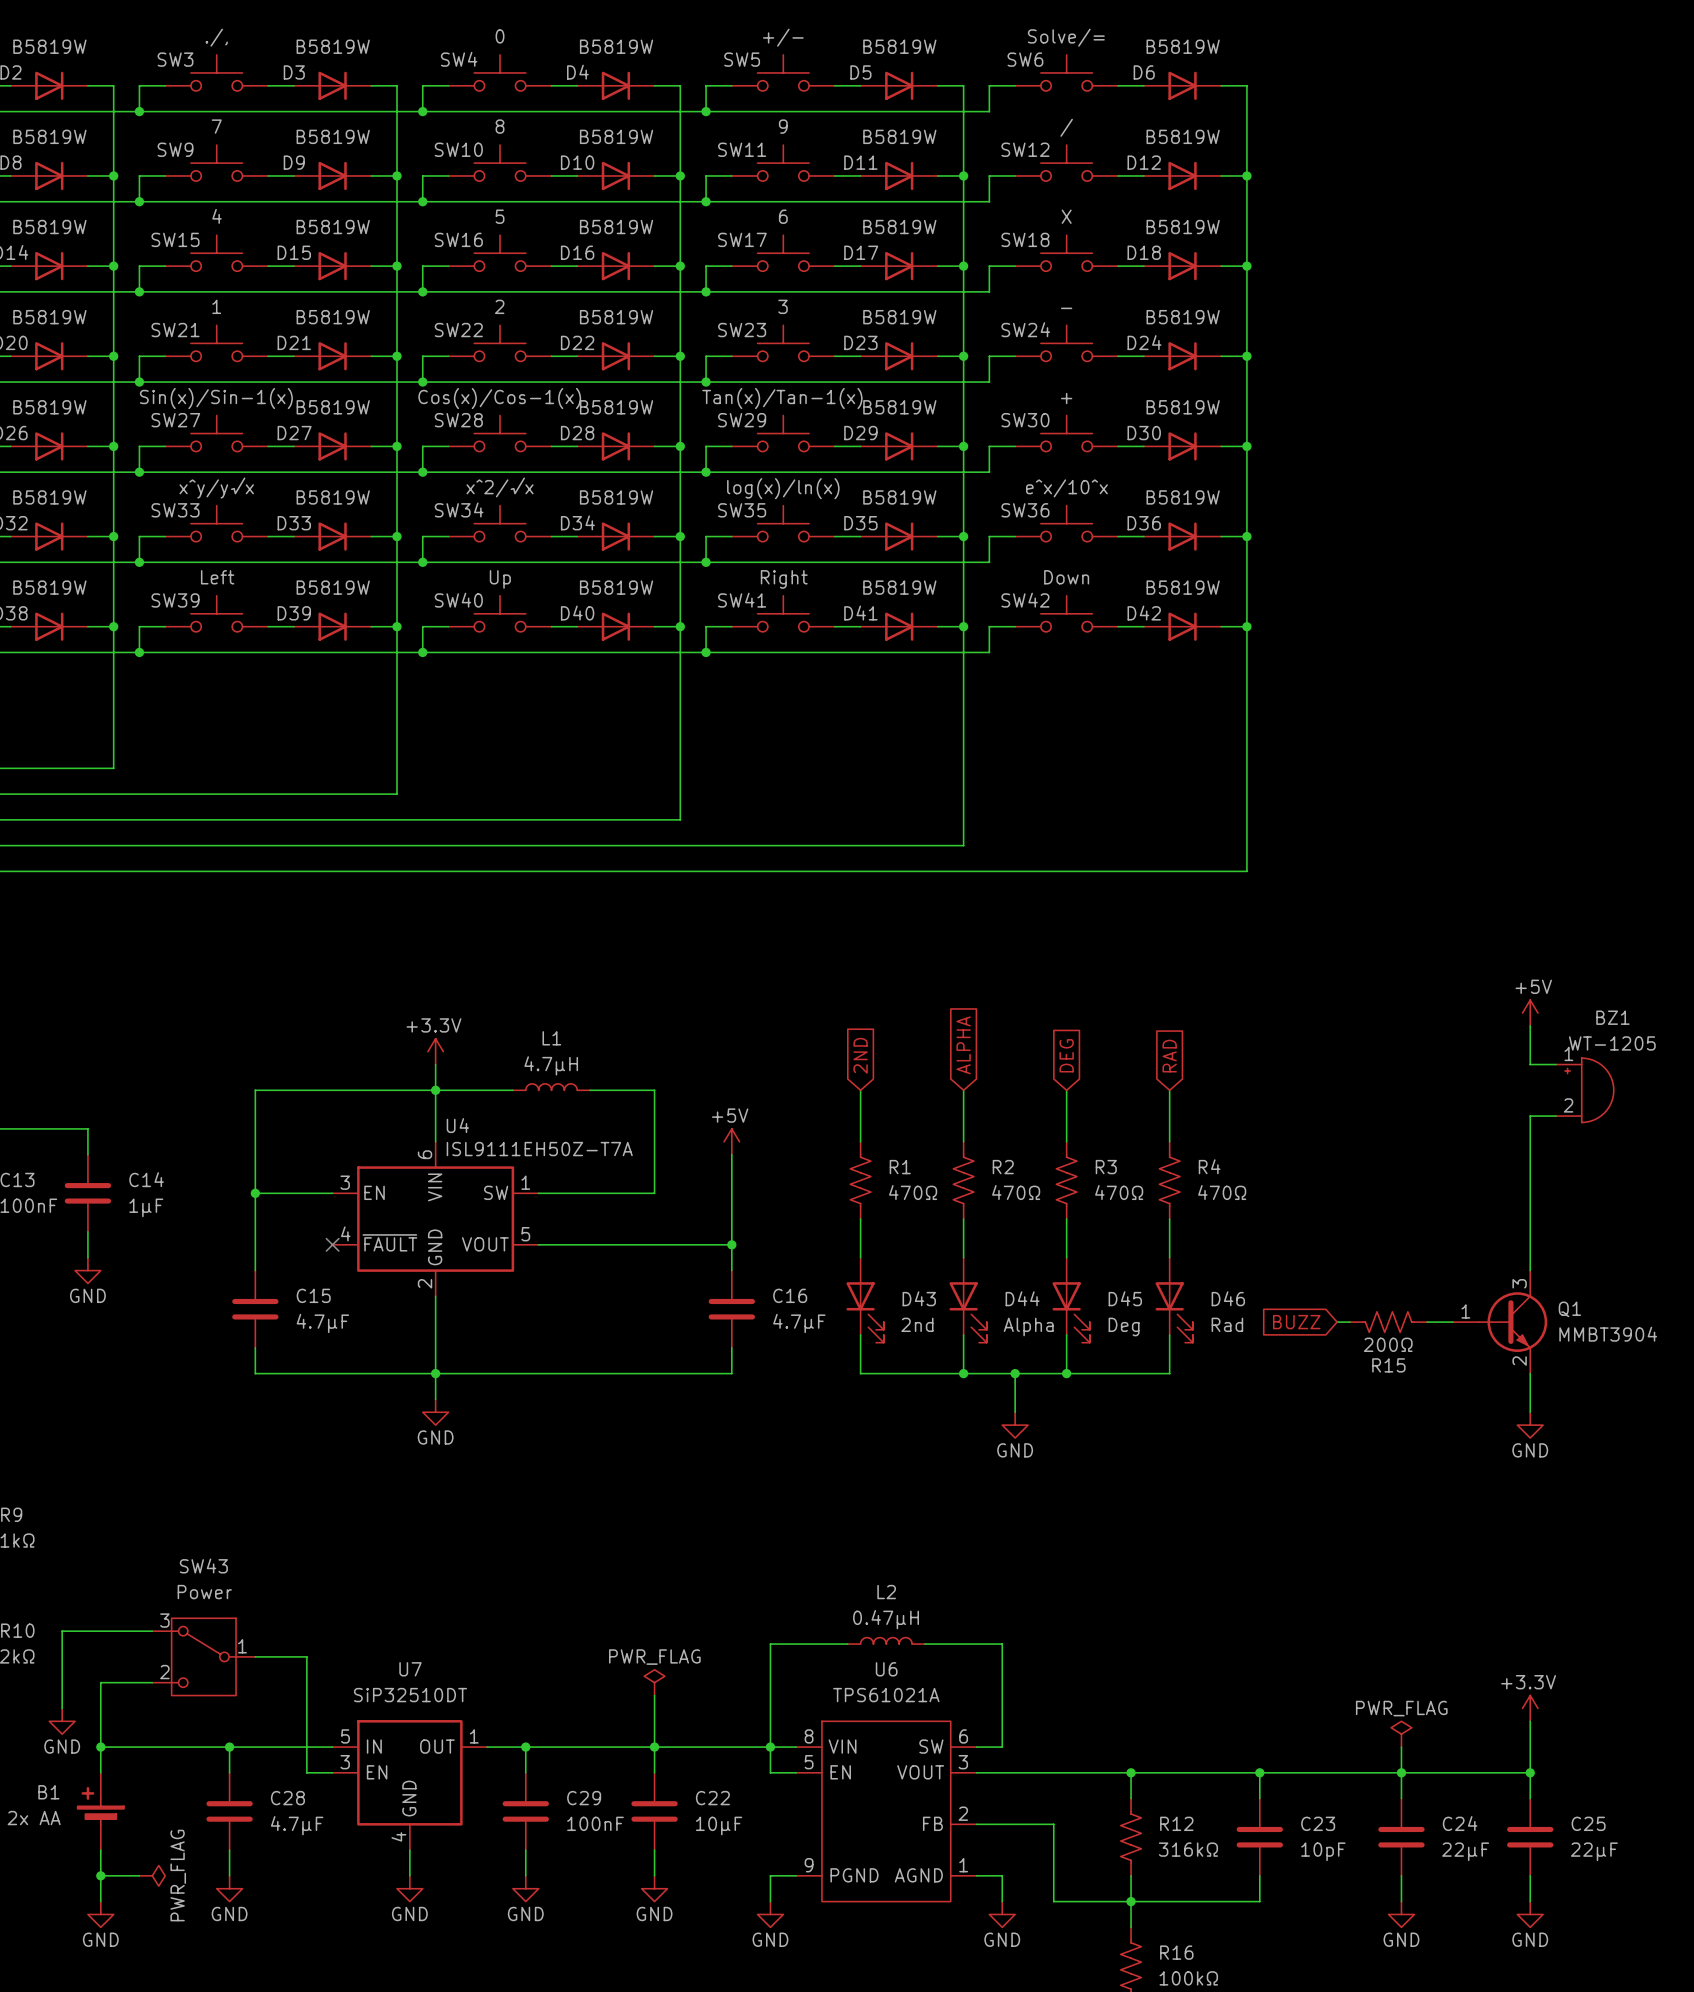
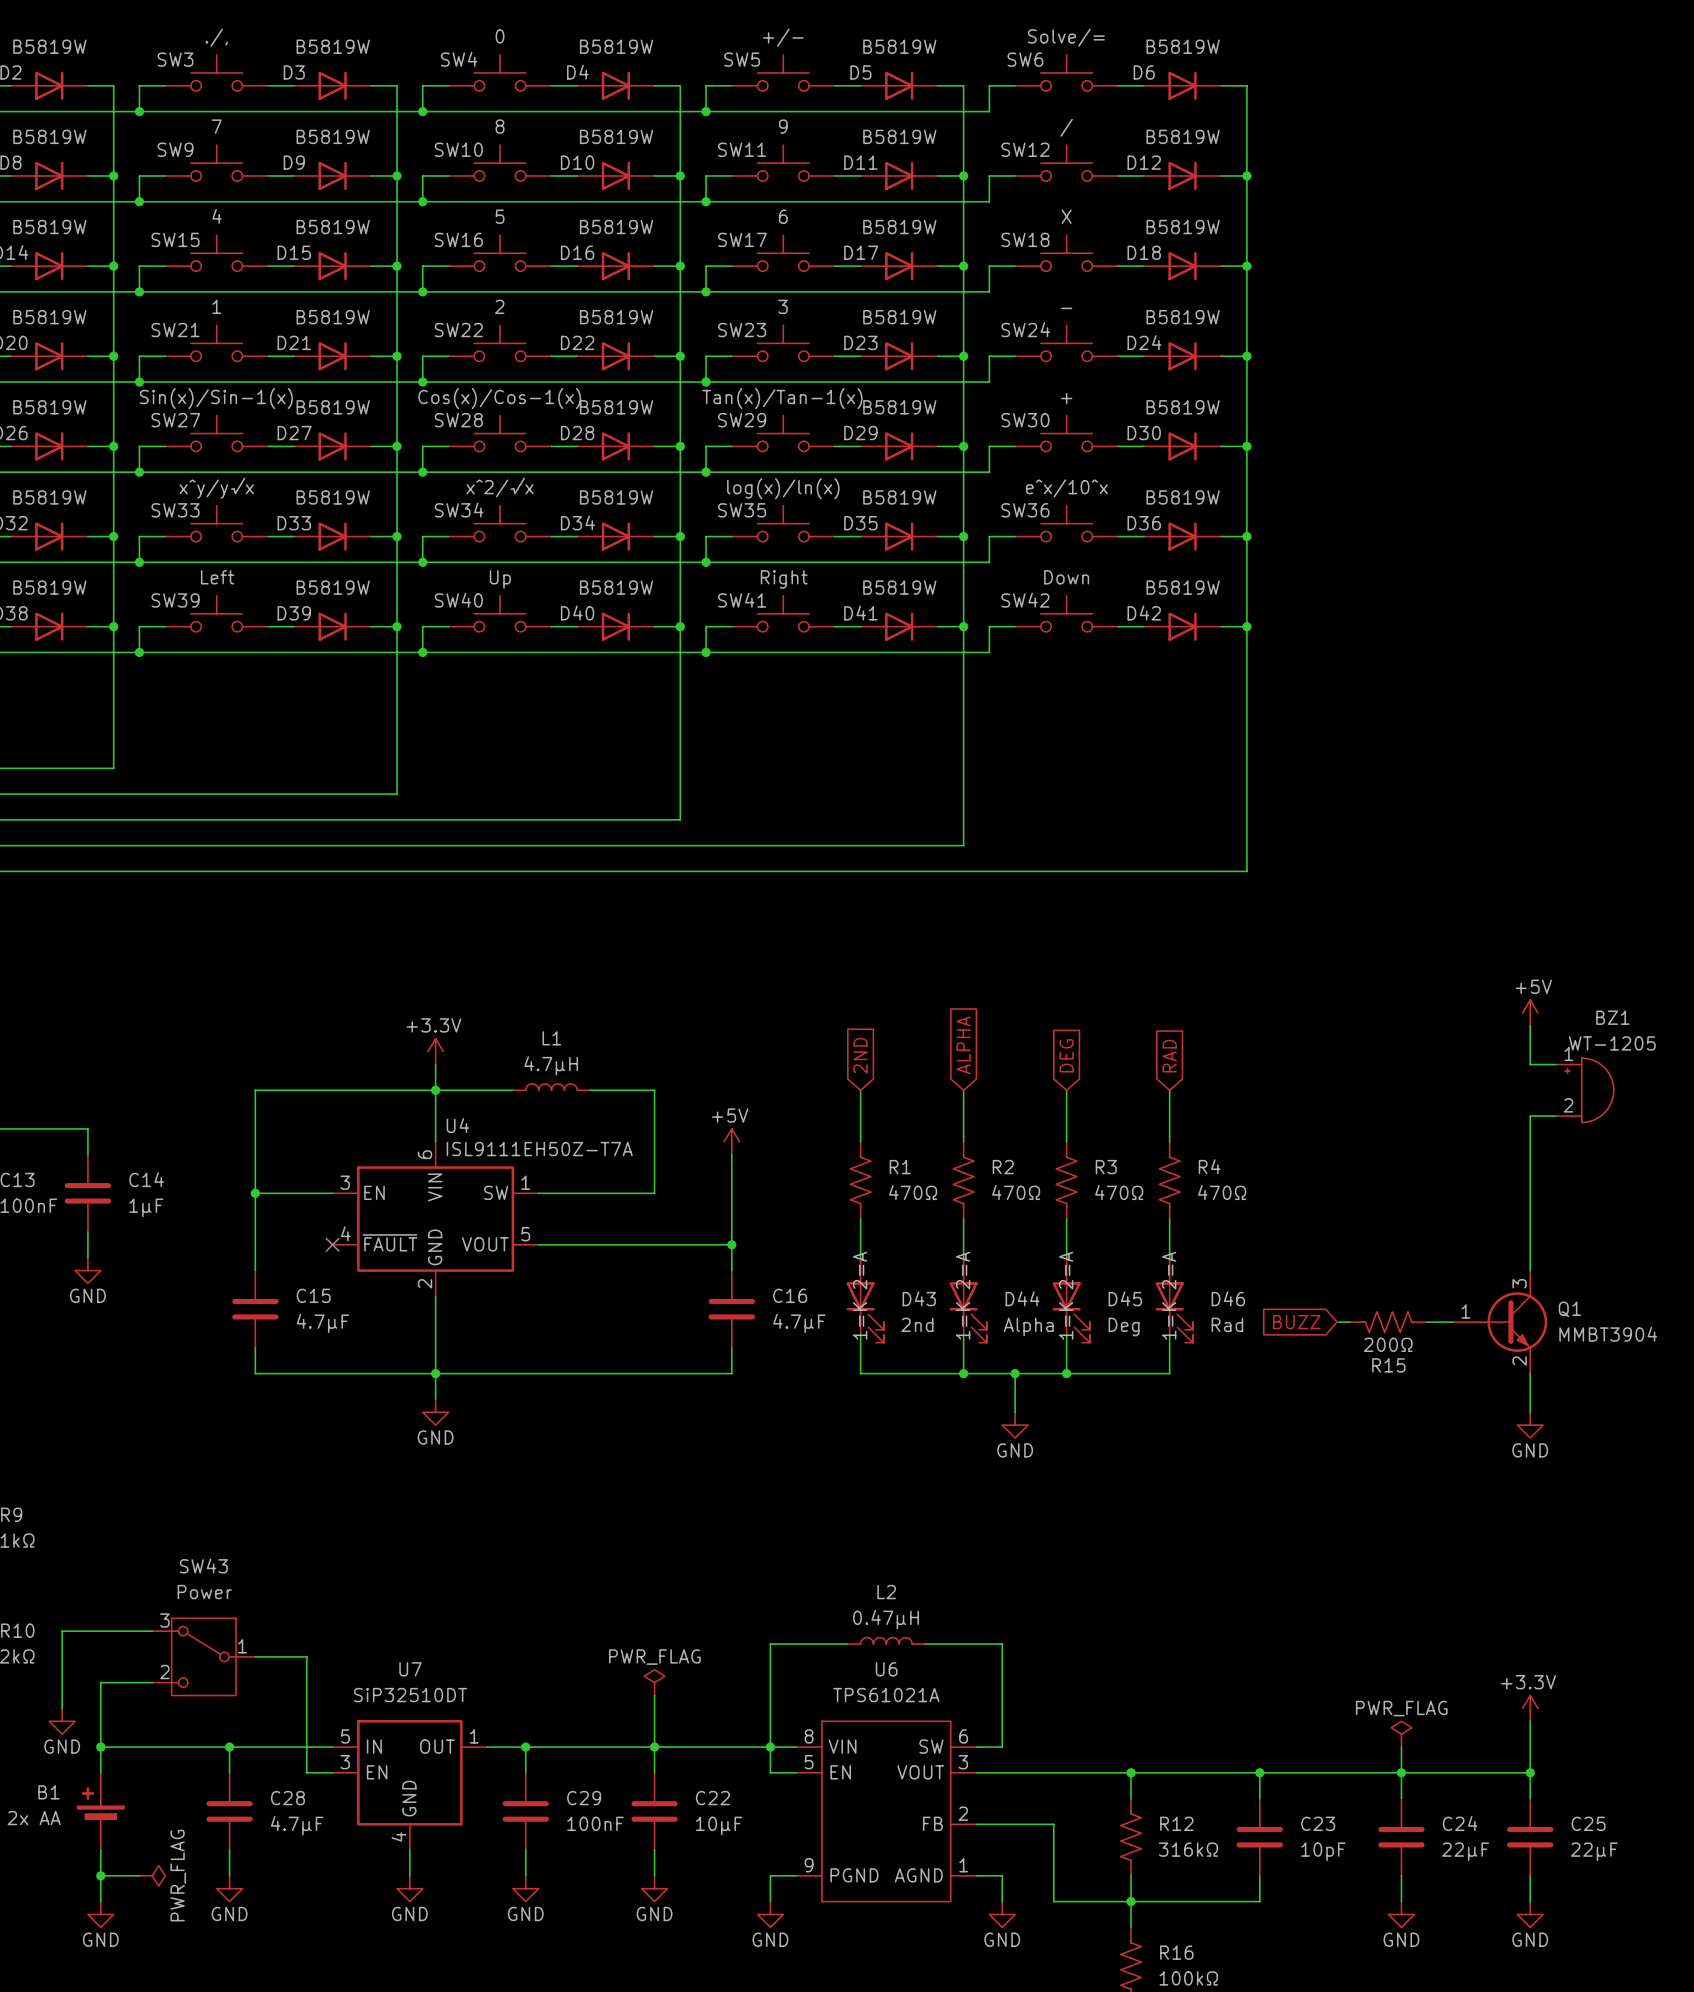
D43 text: none -> 1=K 2=A (860, 1295)
D44 text: none -> 1=K 2=A (963, 1295)
D45 text: none -> 1=K 2=A (1066, 1295)
D46 text: none -> 1=K 2=A (1169, 1295)

